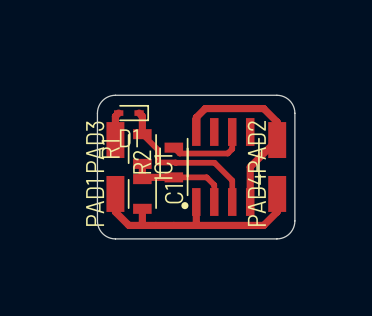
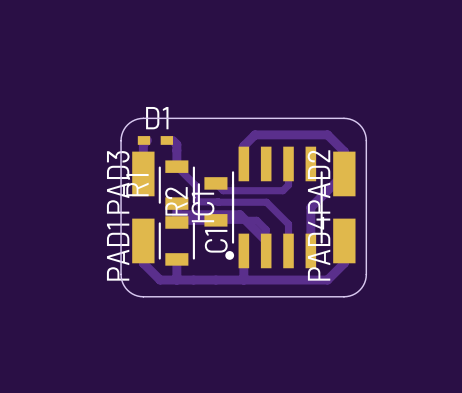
D1 footprint: [114, 104, 150, 122] -> [137, 136, 173, 145]
D1 name position: D1 (128, 138) -> D1 (157, 118)
track: none -> (176, 214) (239, 214) (266, 240)

